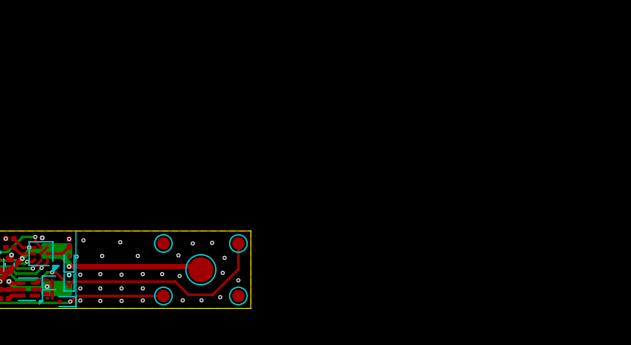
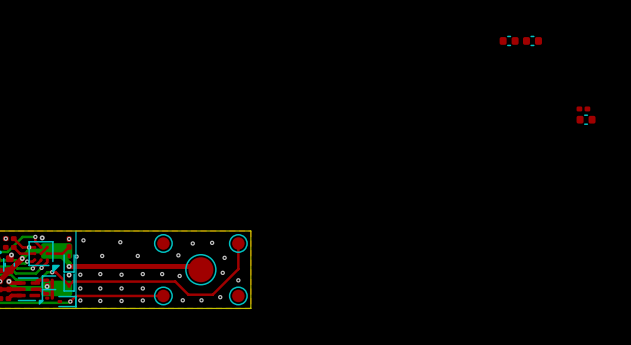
part: none -> (509, 40)
part: none -> (532, 40)
part: none -> (583, 108)
part: none -> (586, 119)

